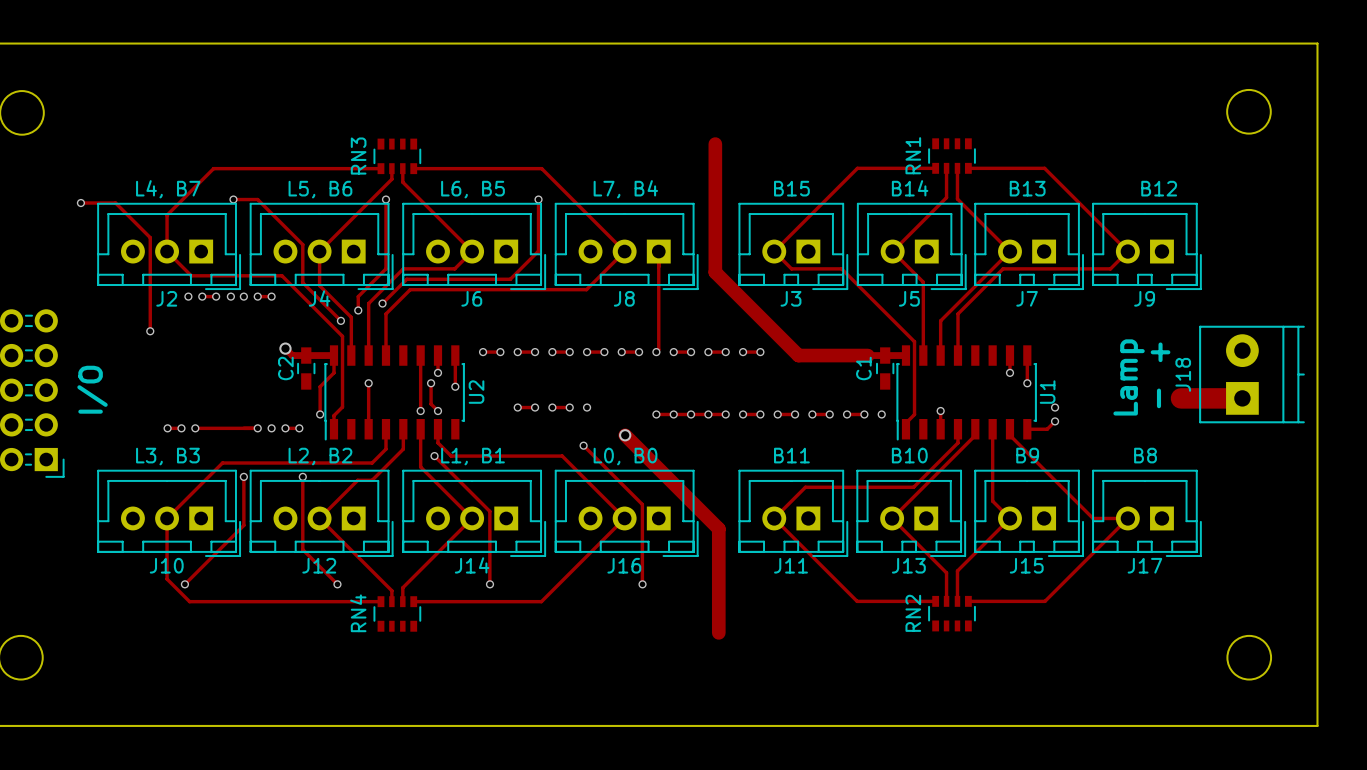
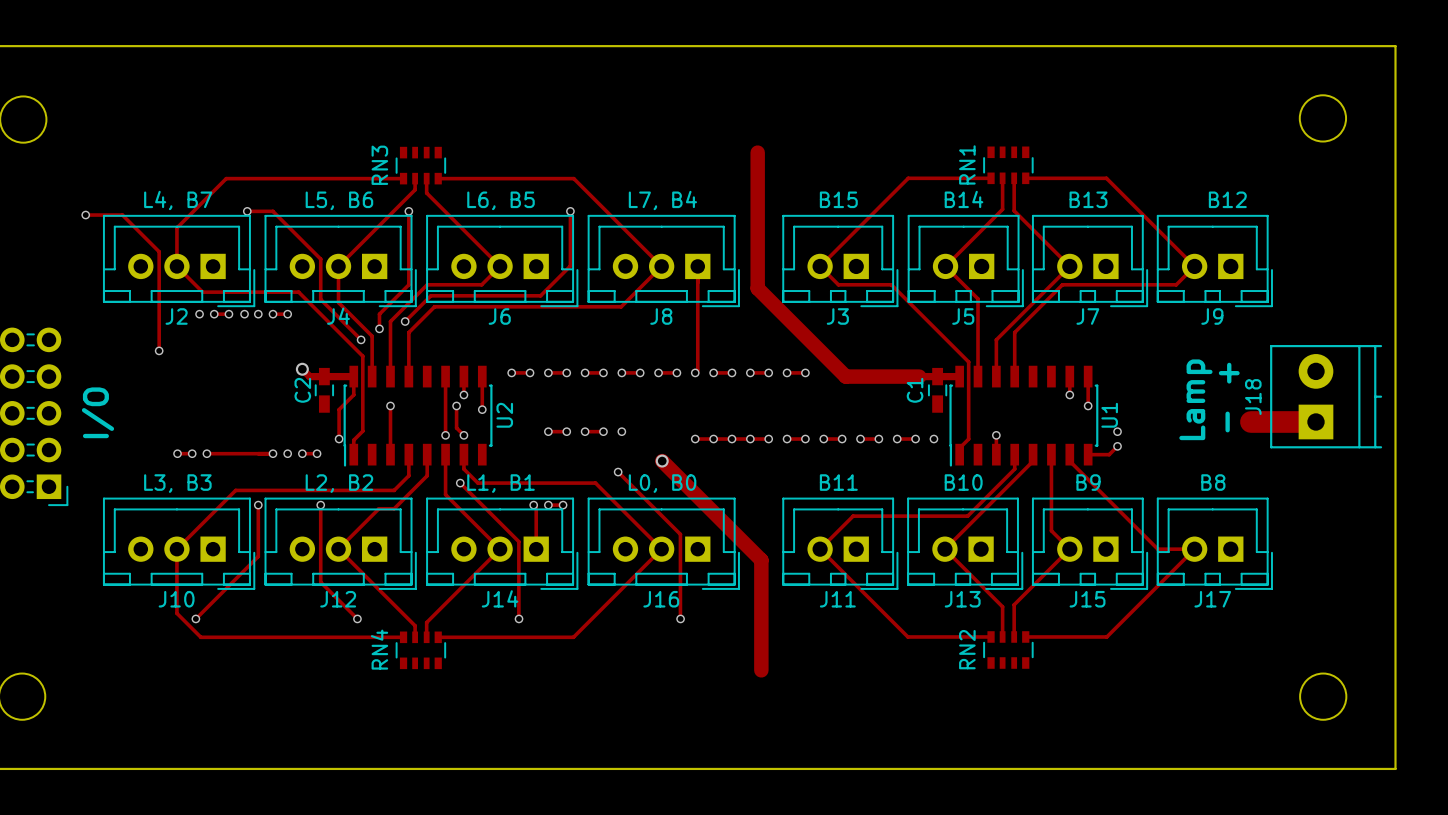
track: none -> (533, 505) (536, 507) (536, 549)
via: none -> (533, 505)
track: none -> (548, 505) (563, 505)
via: none -> (548, 505)
via: none -> (563, 505)

